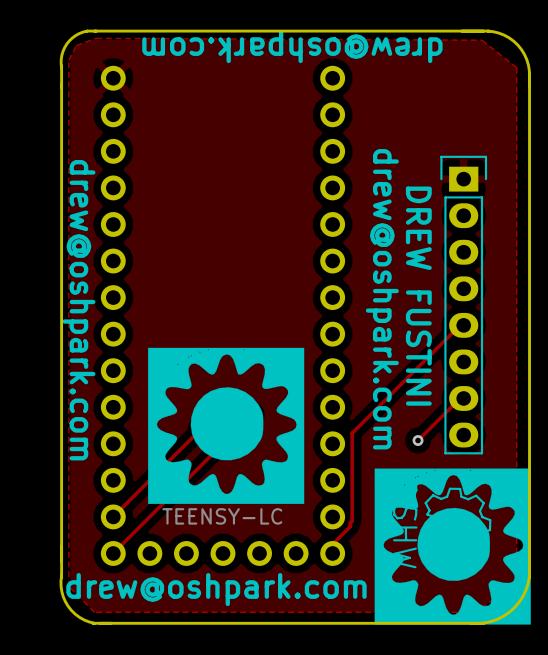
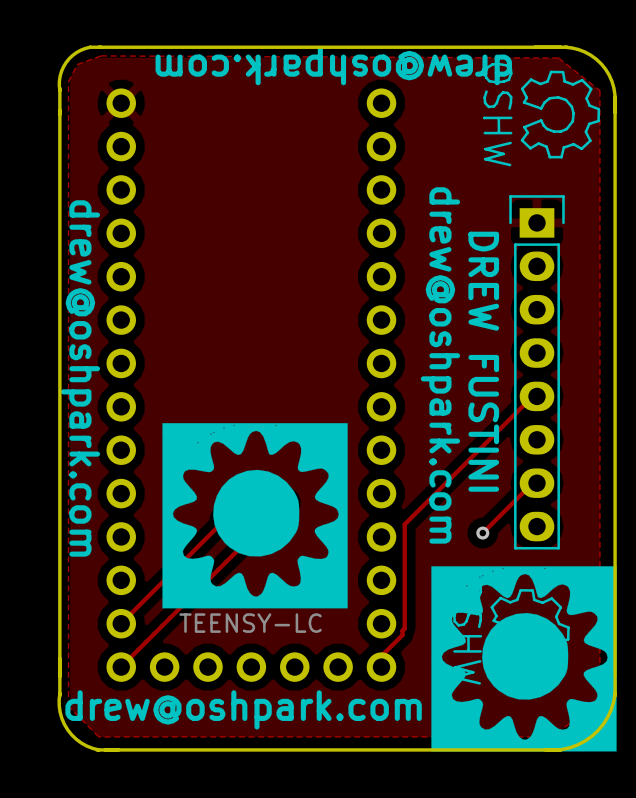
drawing: none -> [483, 62, 601, 167]

